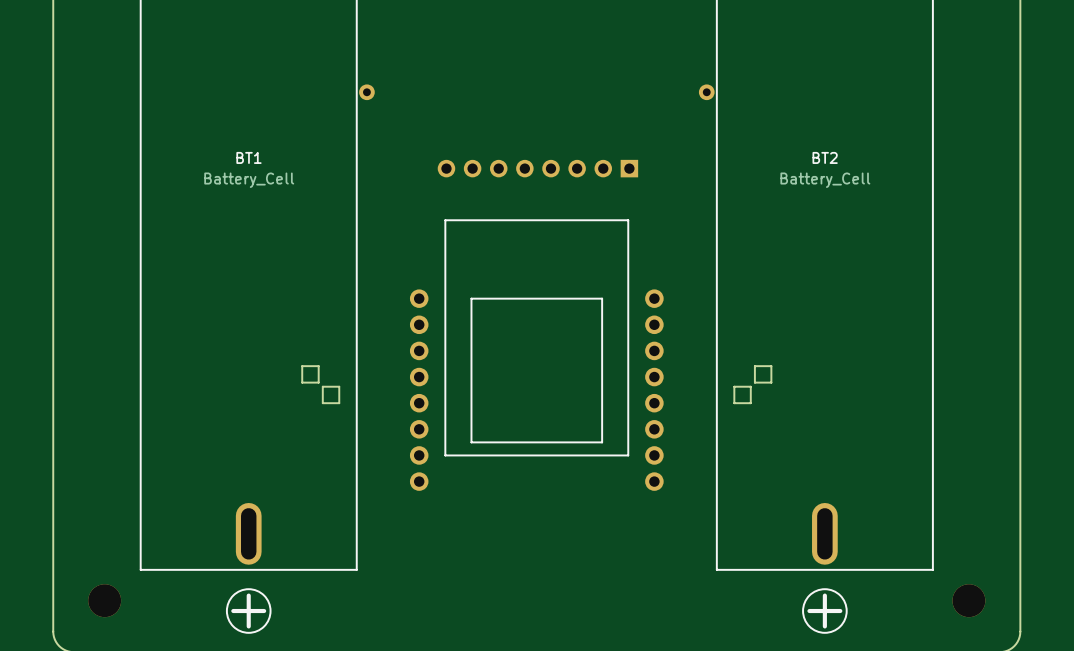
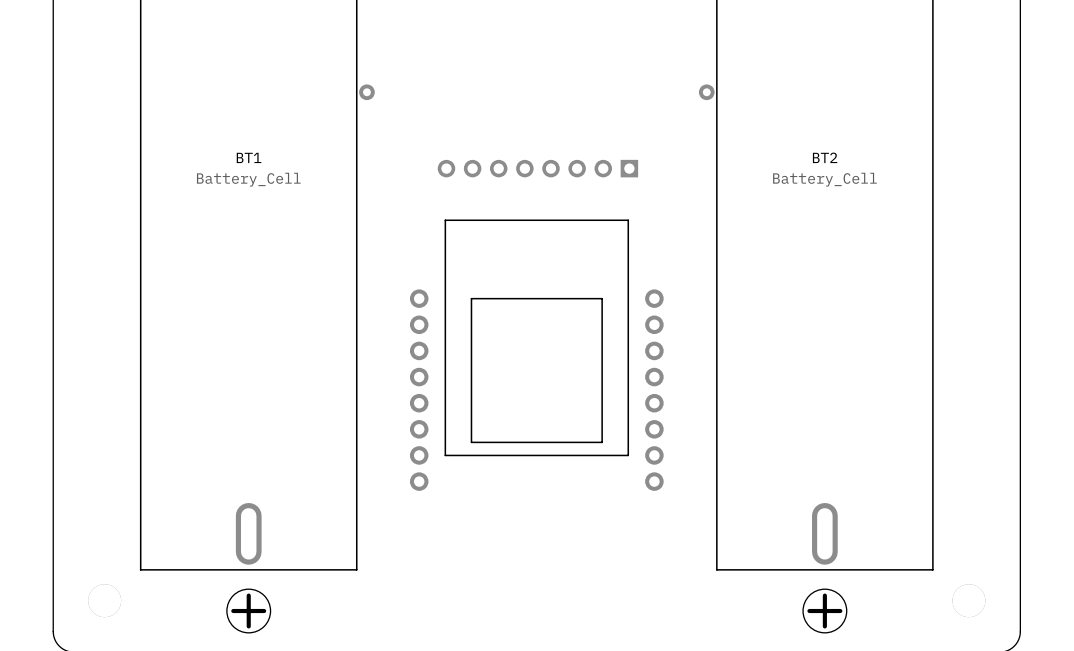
board edge: (318, 366) (302, 366) (302, 382) (318, 382) (318, 366) -> none
board edge: (771, 366) (771, 382) (754, 382) (754, 366) (771, 366) -> none
board edge: (339, 386) (322, 386) (322, 403) (339, 403) (339, 386) -> none
board edge: (750, 386) (734, 386) (734, 403) (750, 403) (750, 386) -> none

